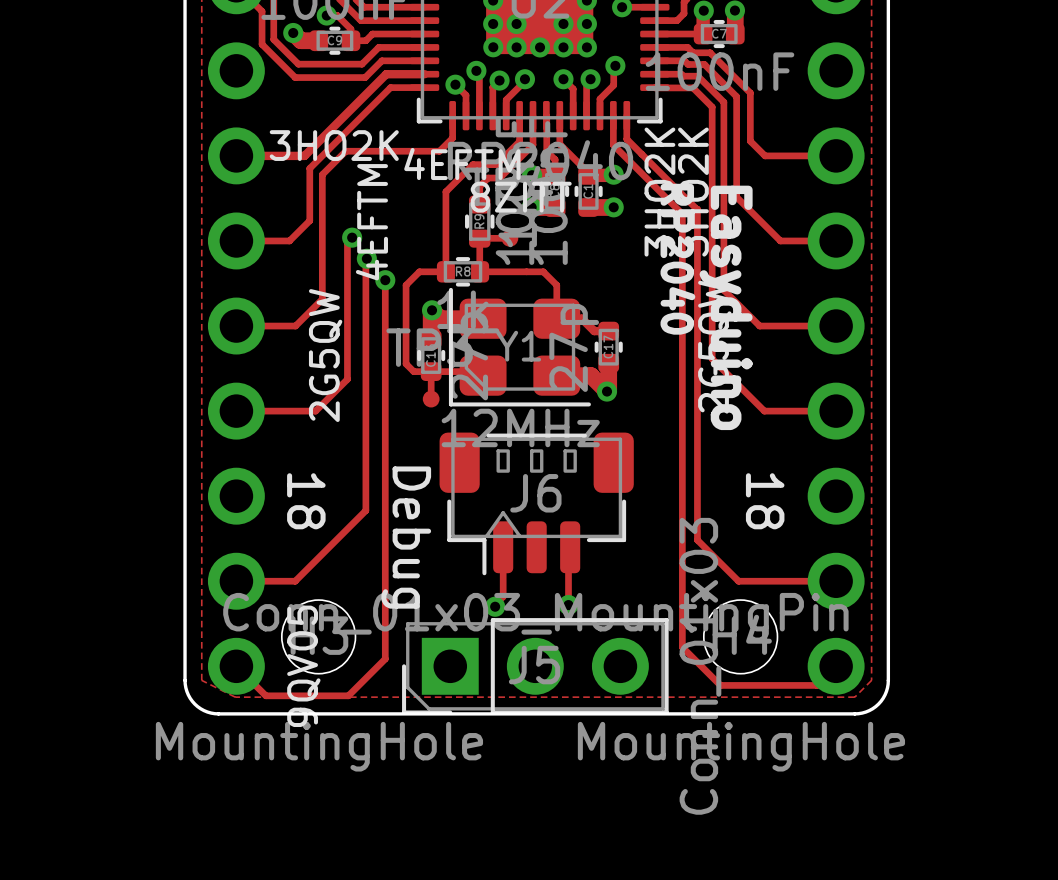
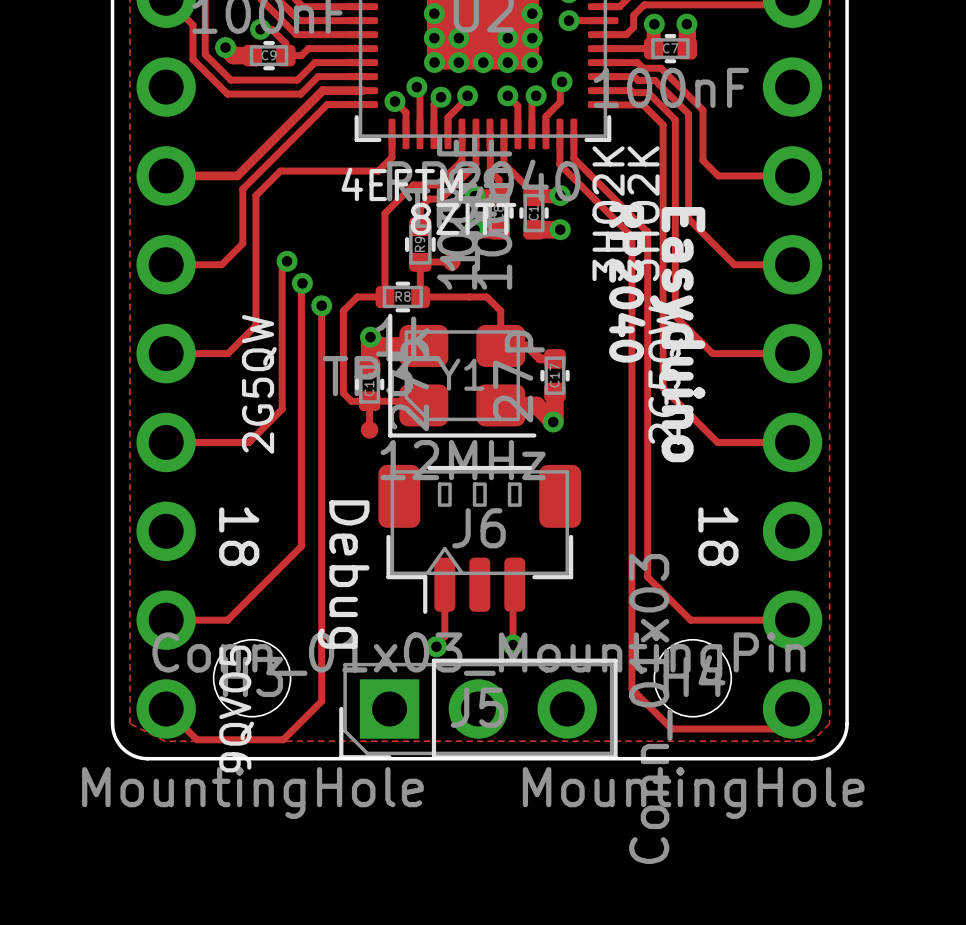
C9 text: 3HO2K (334, 145) -> none
R9 text: 4EFTM (371, 222) -> none

